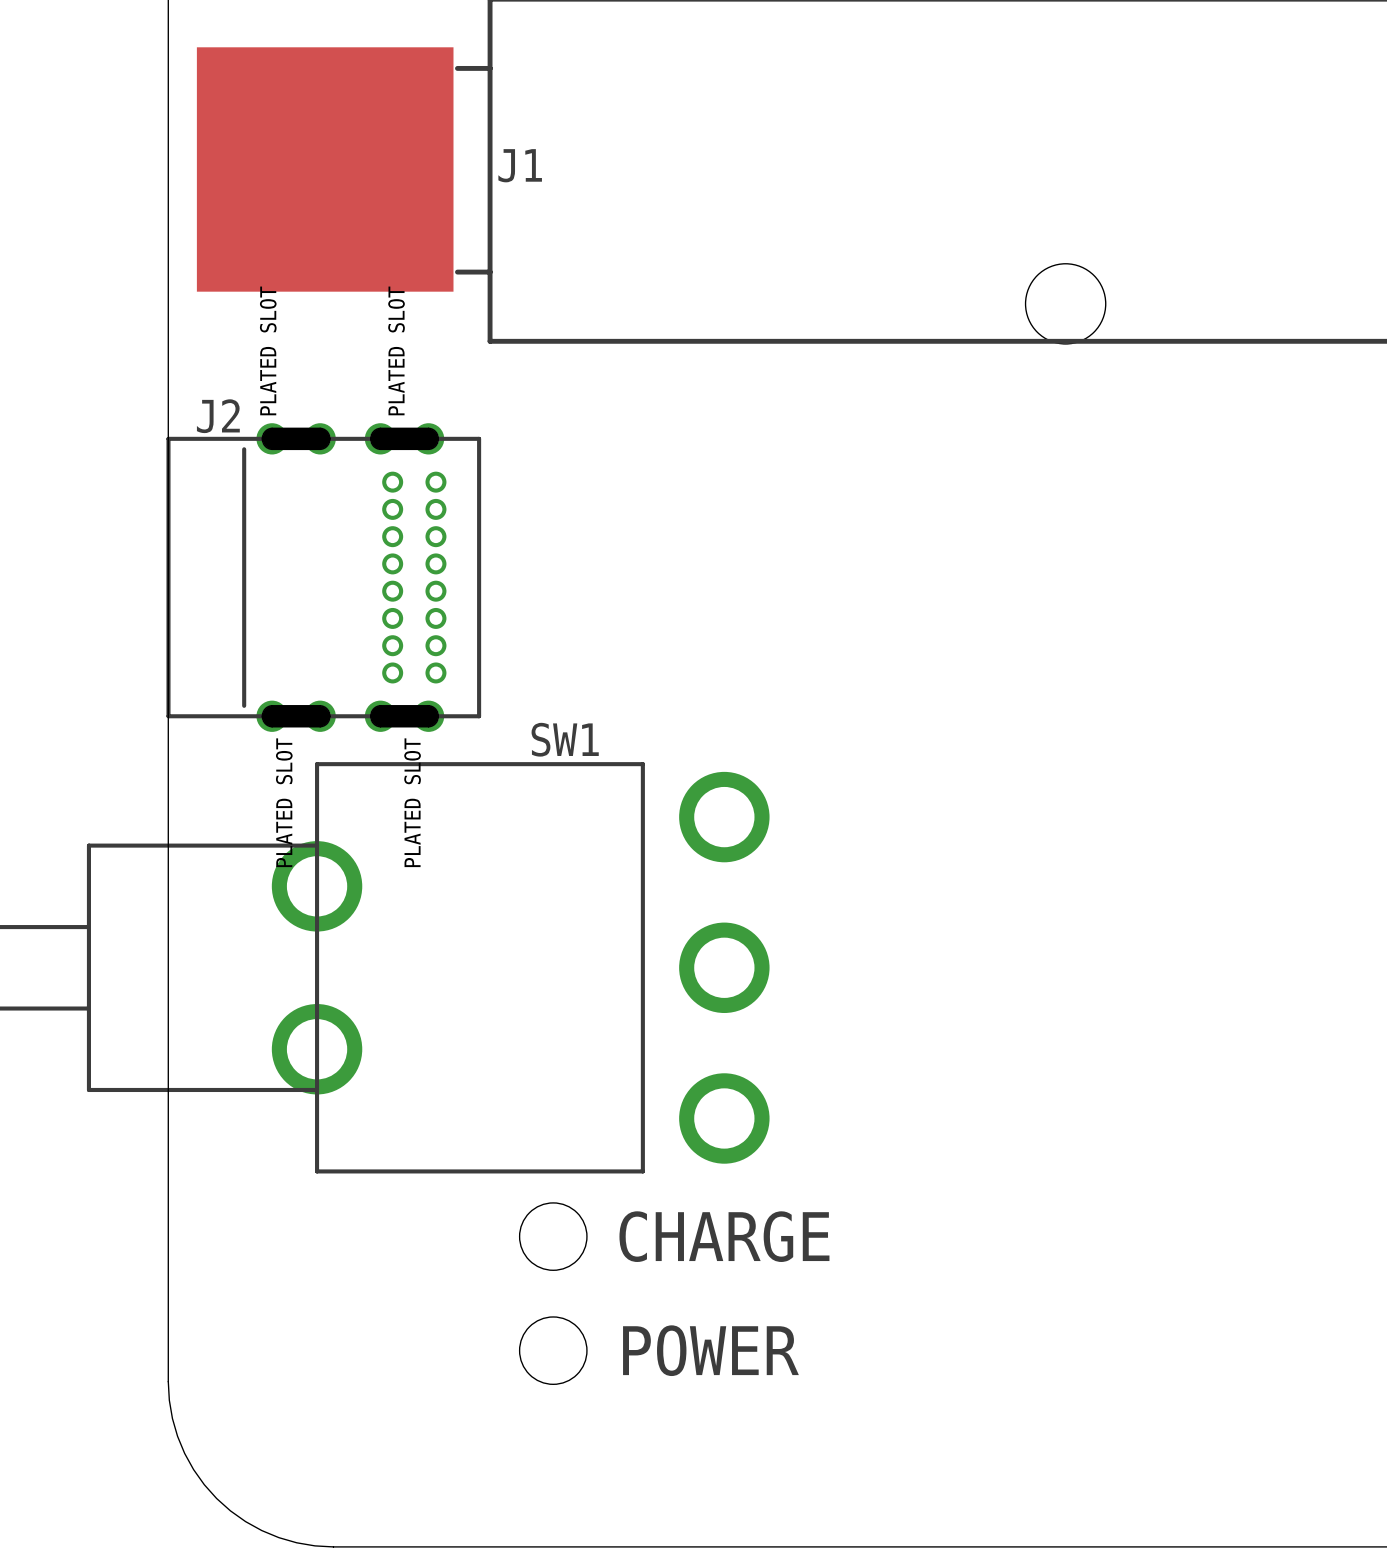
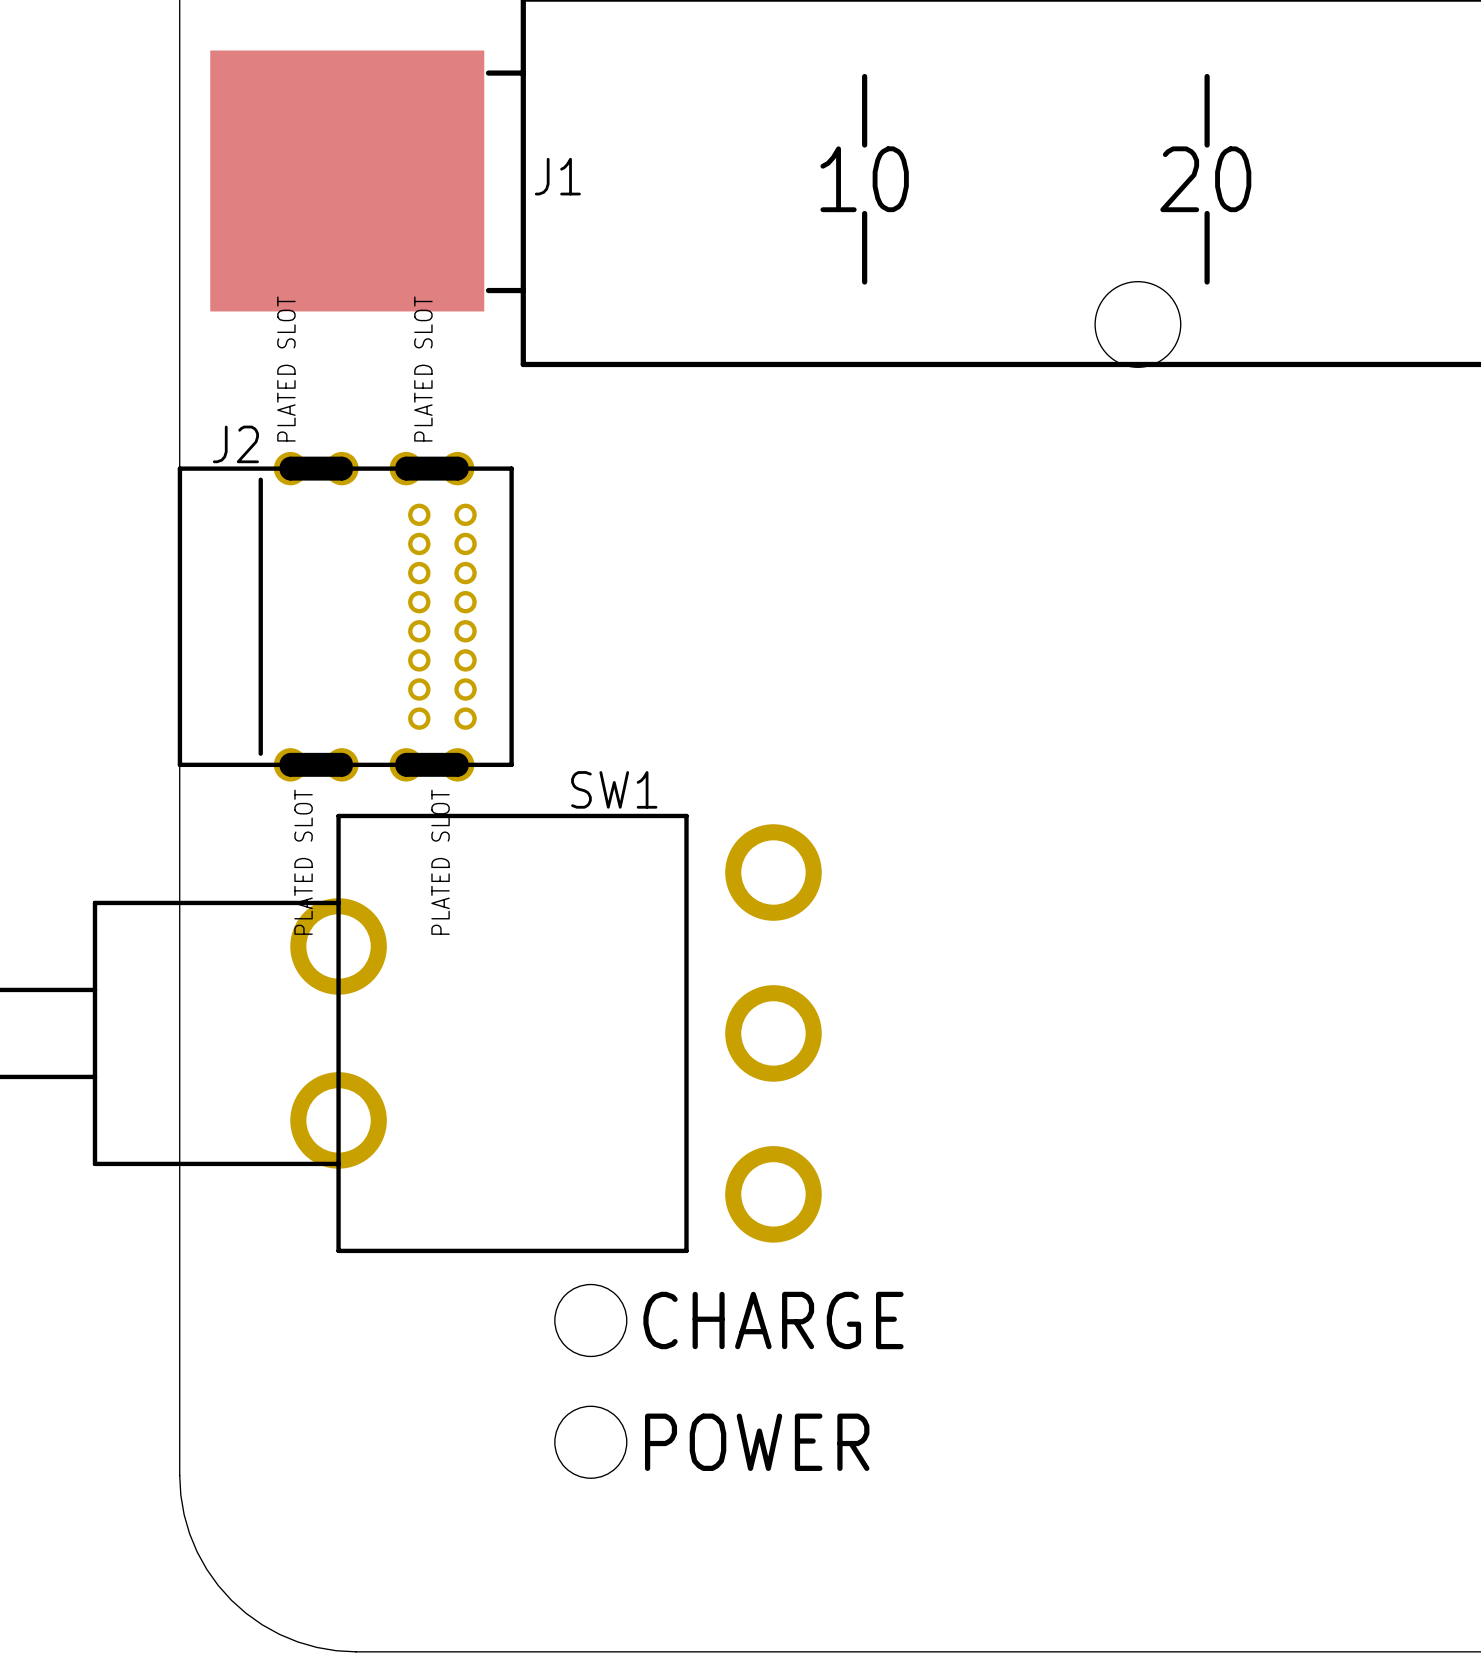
line: none -> (864, 76) (864, 145)
line: none -> (1207, 76) (1207, 145)
text: none -> 10 (864, 179)
text: none -> 20 (1205, 179)
line: none -> (864, 213) (864, 282)
line: none -> (1207, 213) (1207, 282)

